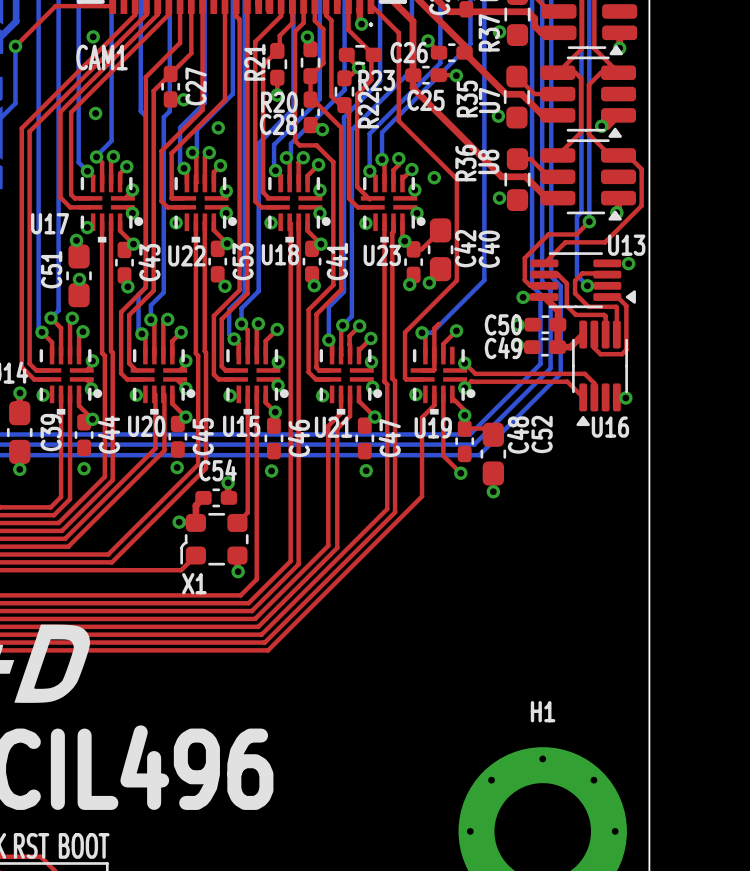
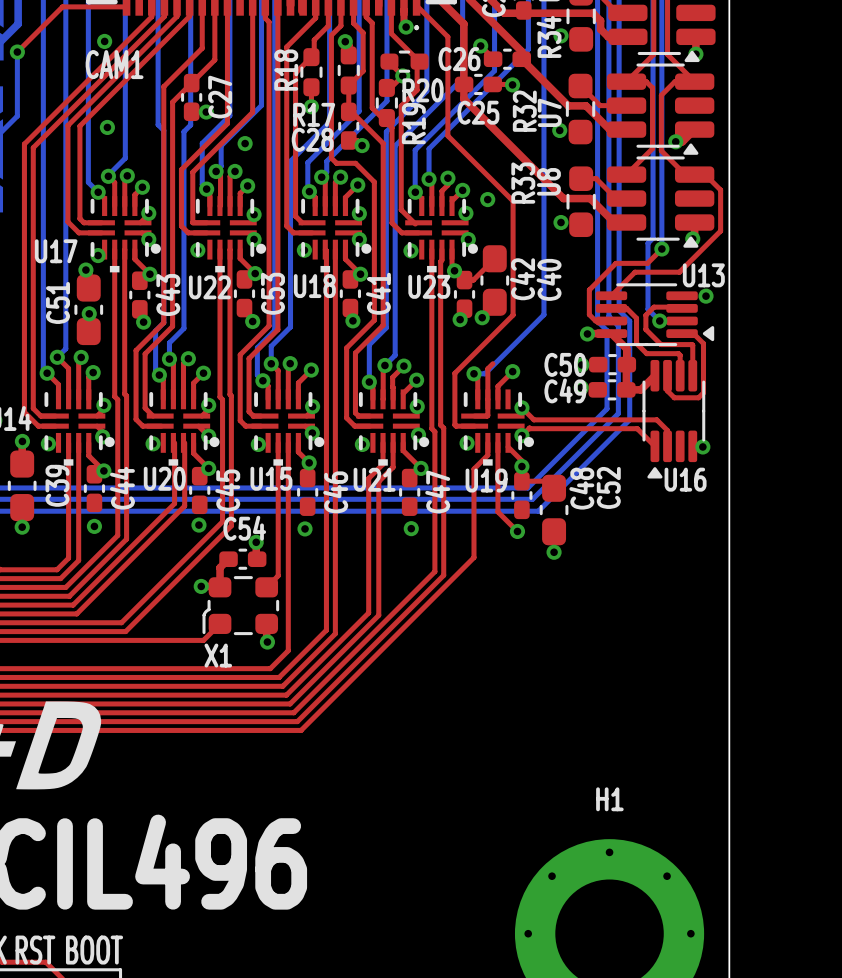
R37 name: R37 (489, 32) -> R34 (549, 36)
R21 name: R21 (254, 62) -> R18 (286, 70)
R23 name: R23 (376, 80) -> R20 (423, 90)
R35 name: R35 (467, 99) -> R32 (524, 111)
R20 name: R20 (279, 102) -> R17 (314, 114)
R22 name: R22 (368, 110) -> R19 (413, 123)
R36 name: R36 (465, 163) -> R33 (523, 183)

